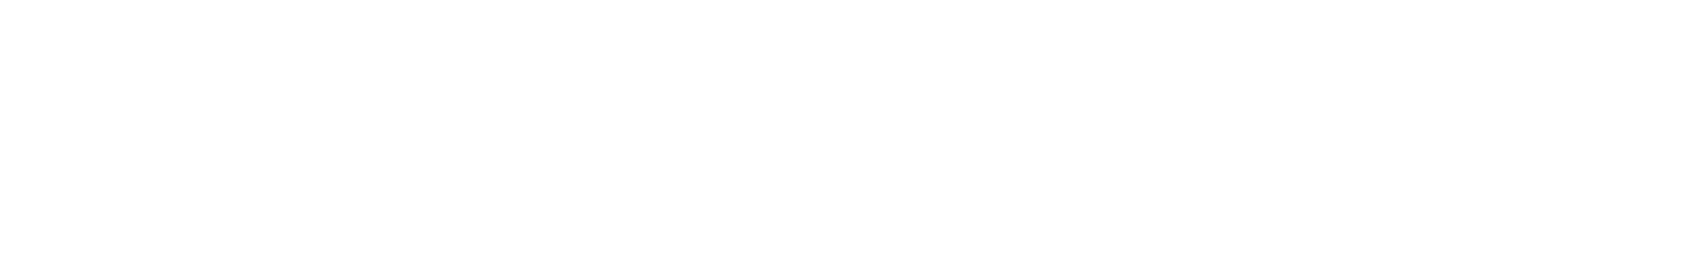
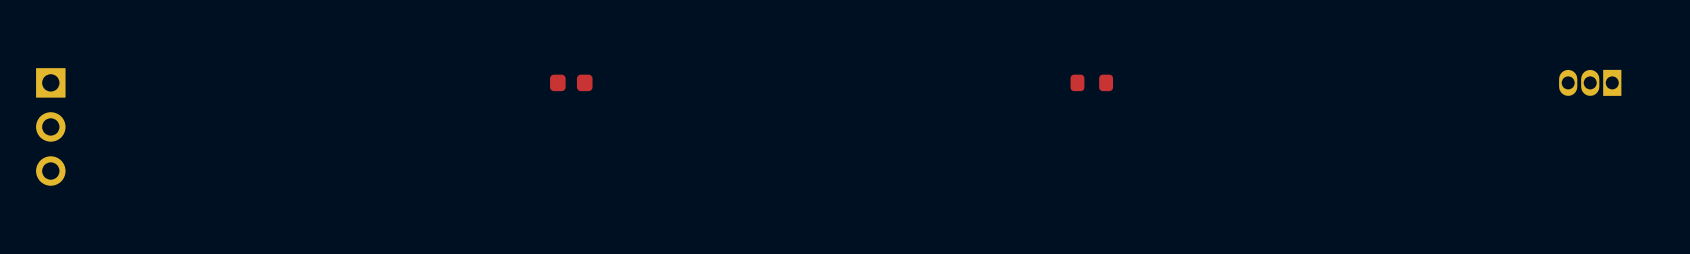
part: none -> (571, 82)
part: none -> (1091, 82)
part: none -> (1590, 82)
part: none -> (50, 126)

